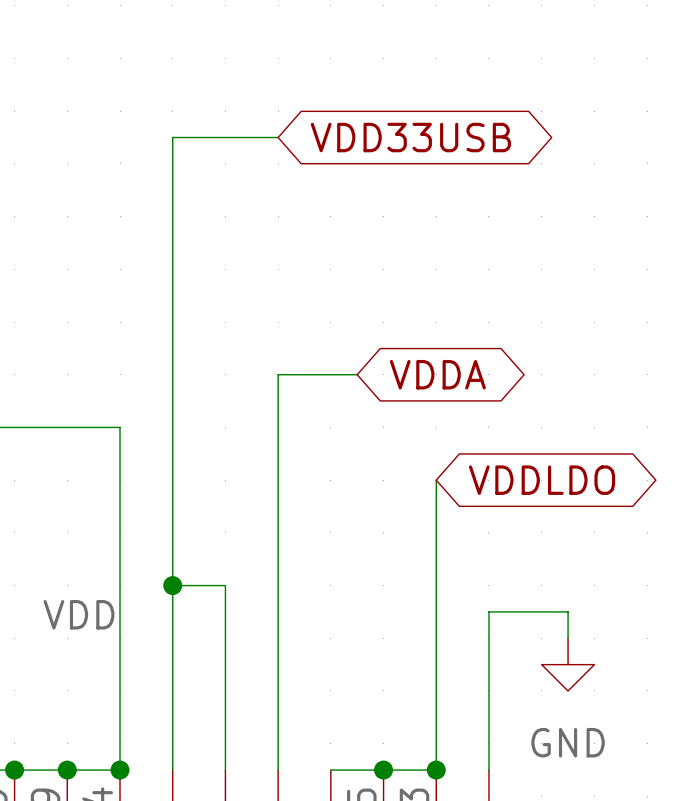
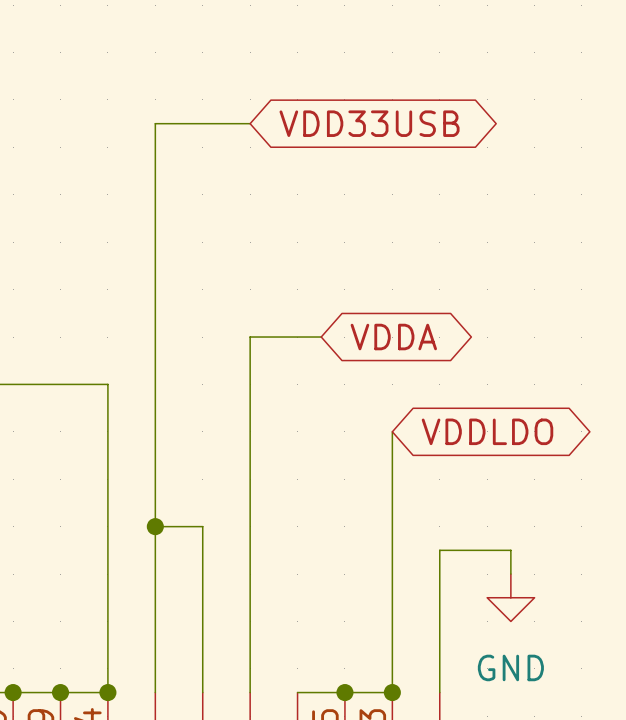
label: VDD (79, 614) -> none

